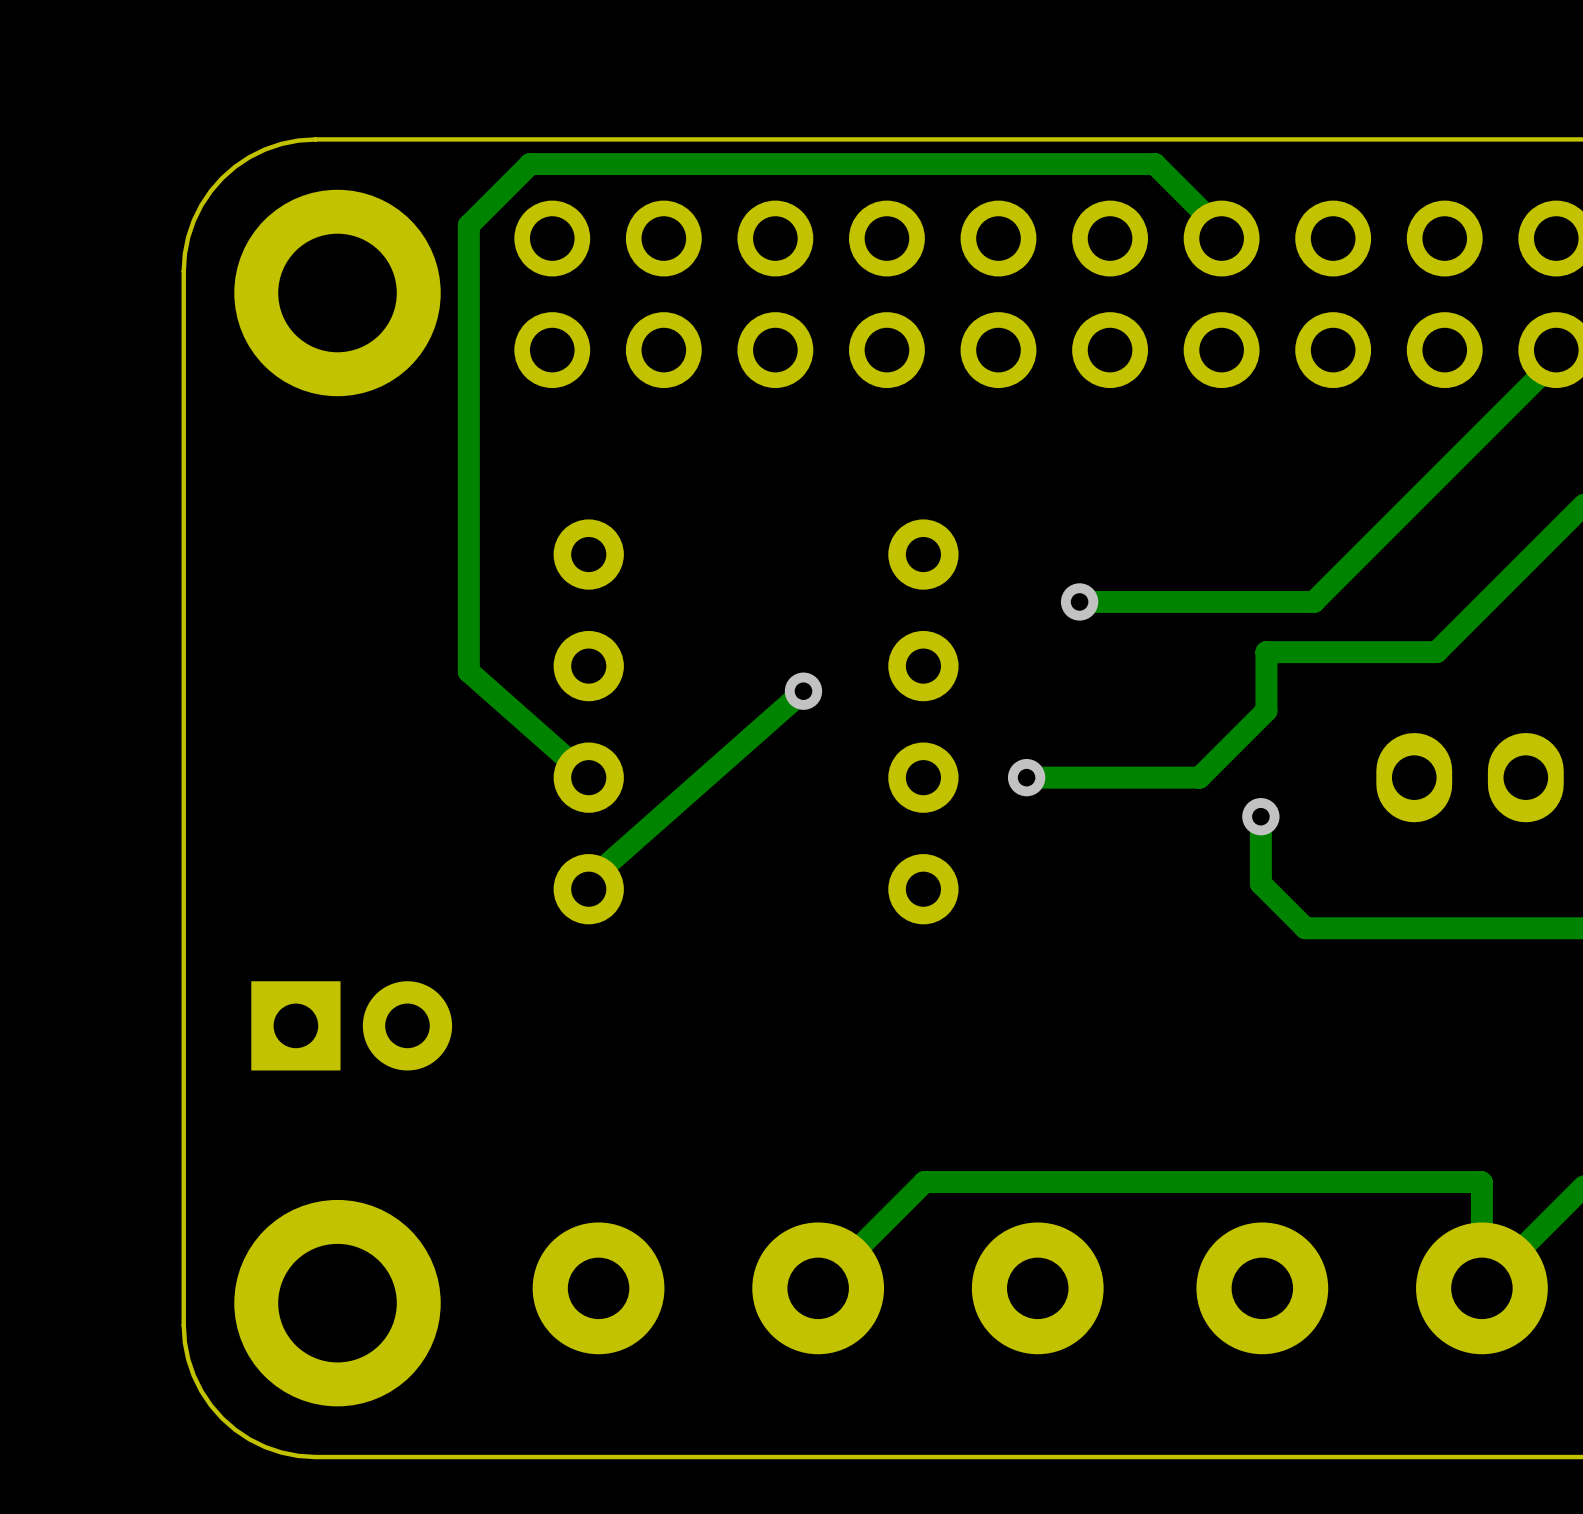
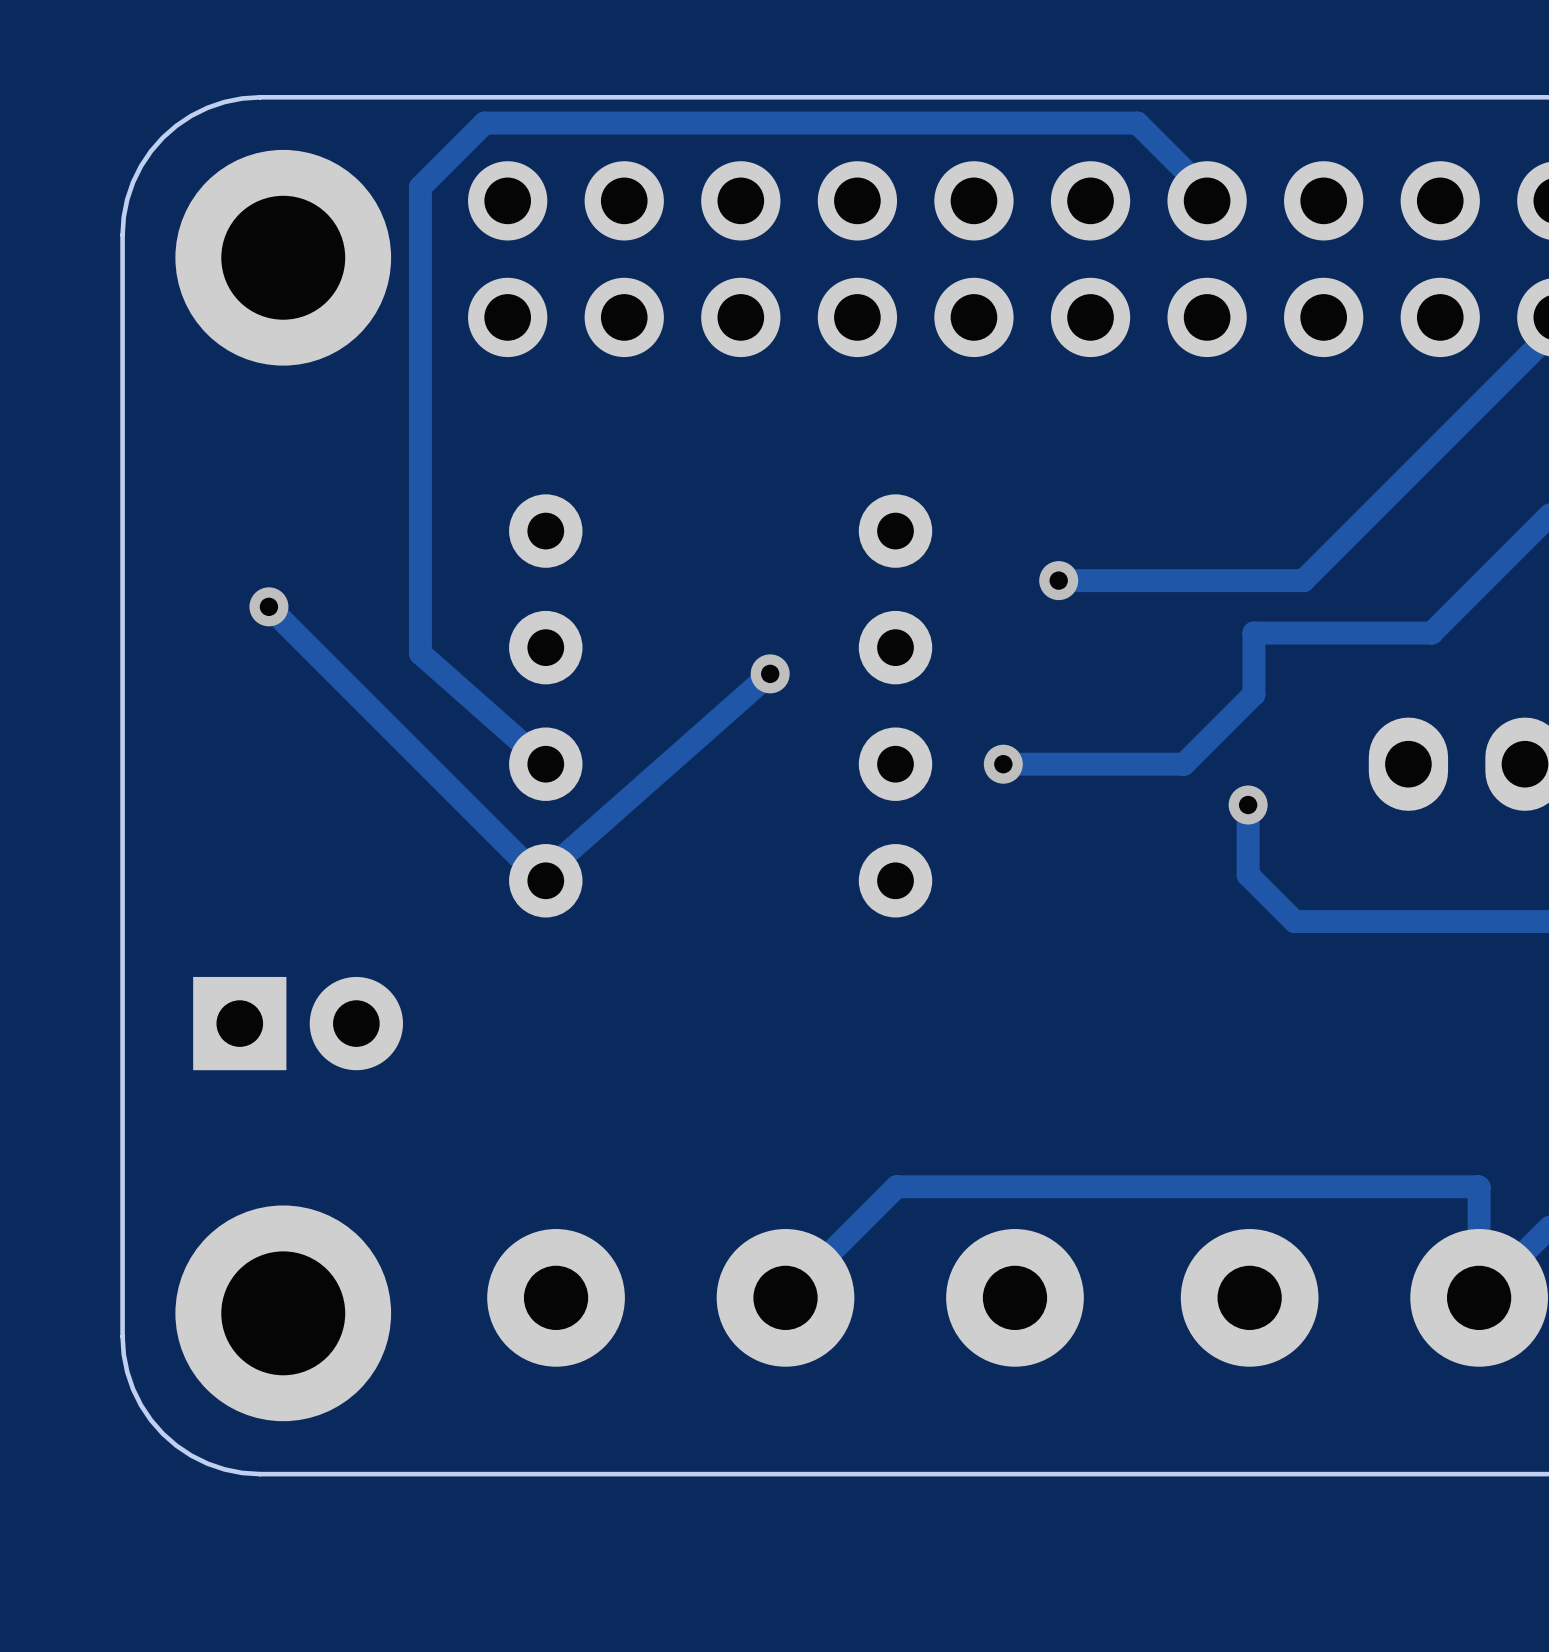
track: none -> (268, 606) (542, 880)
via: none -> (268, 606)

